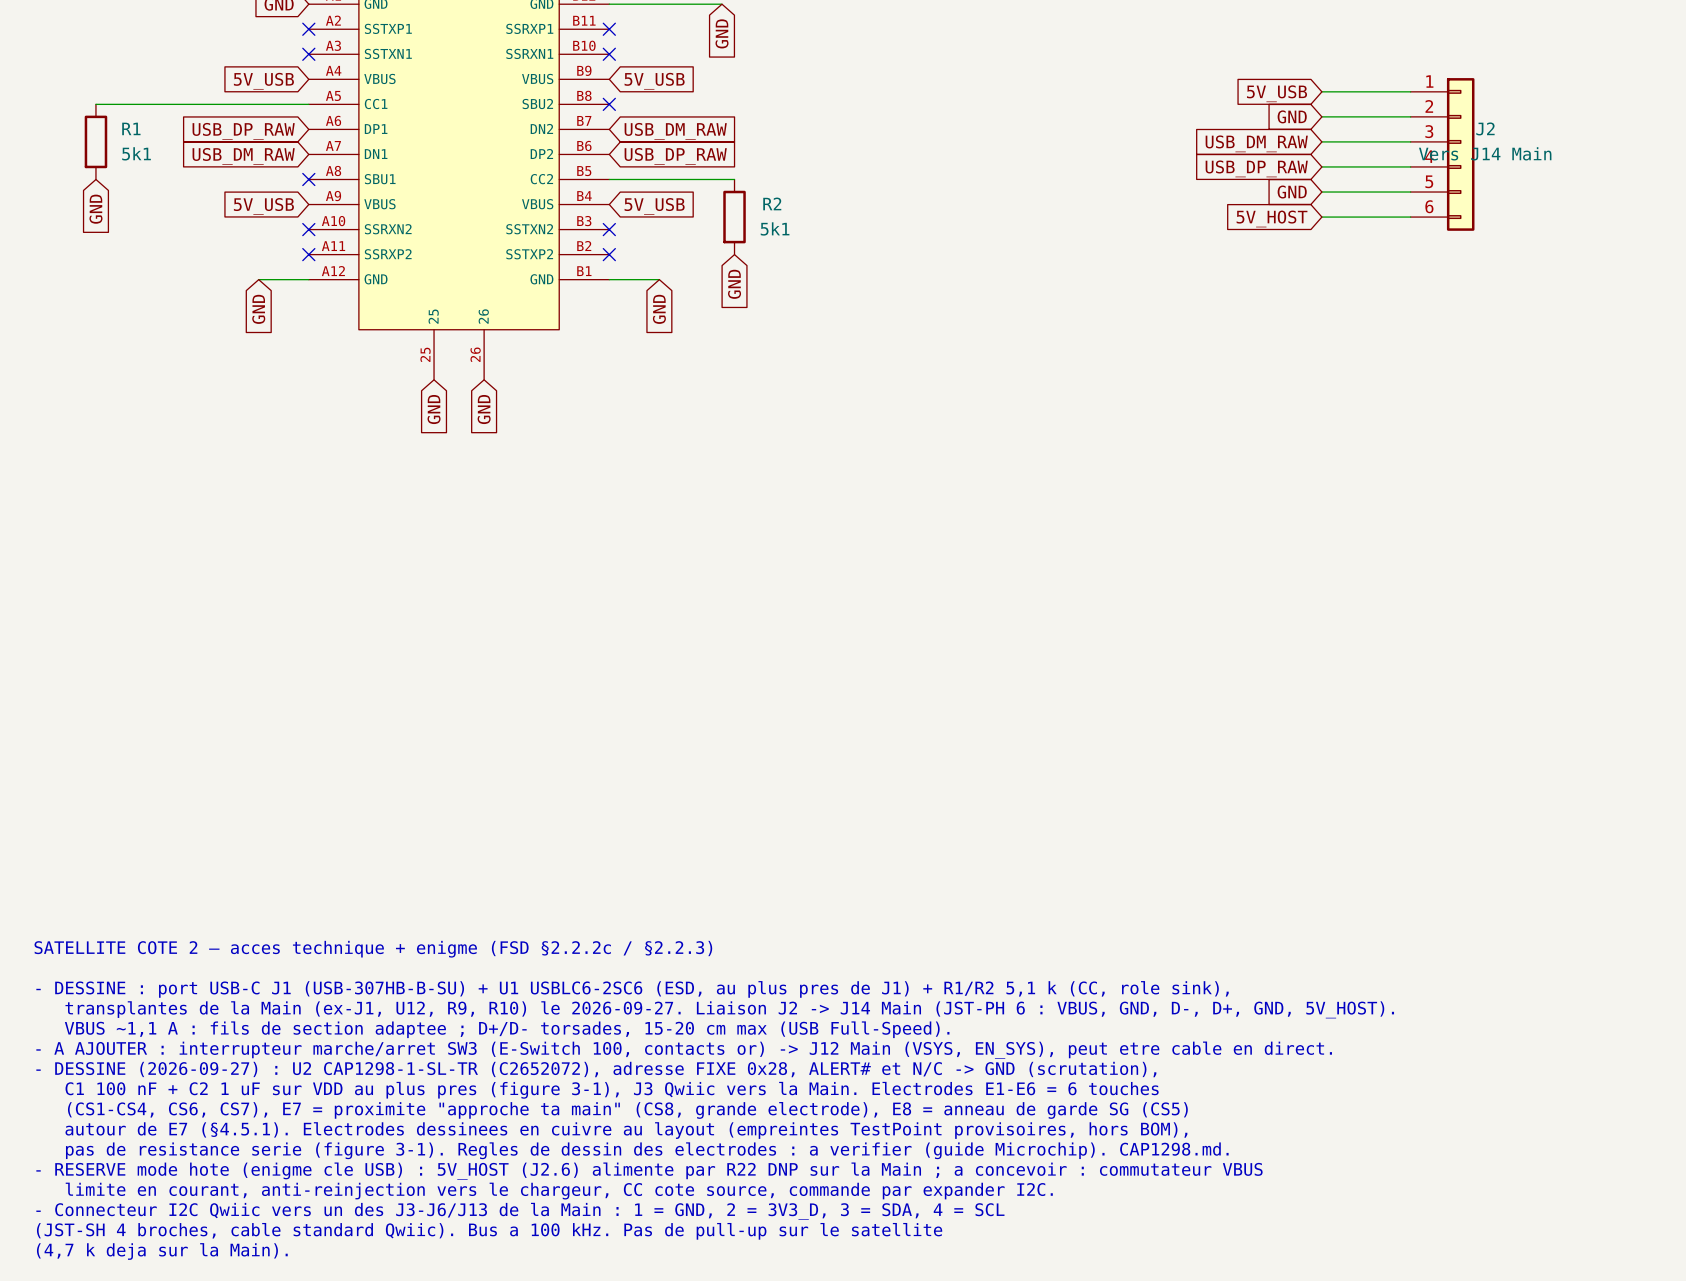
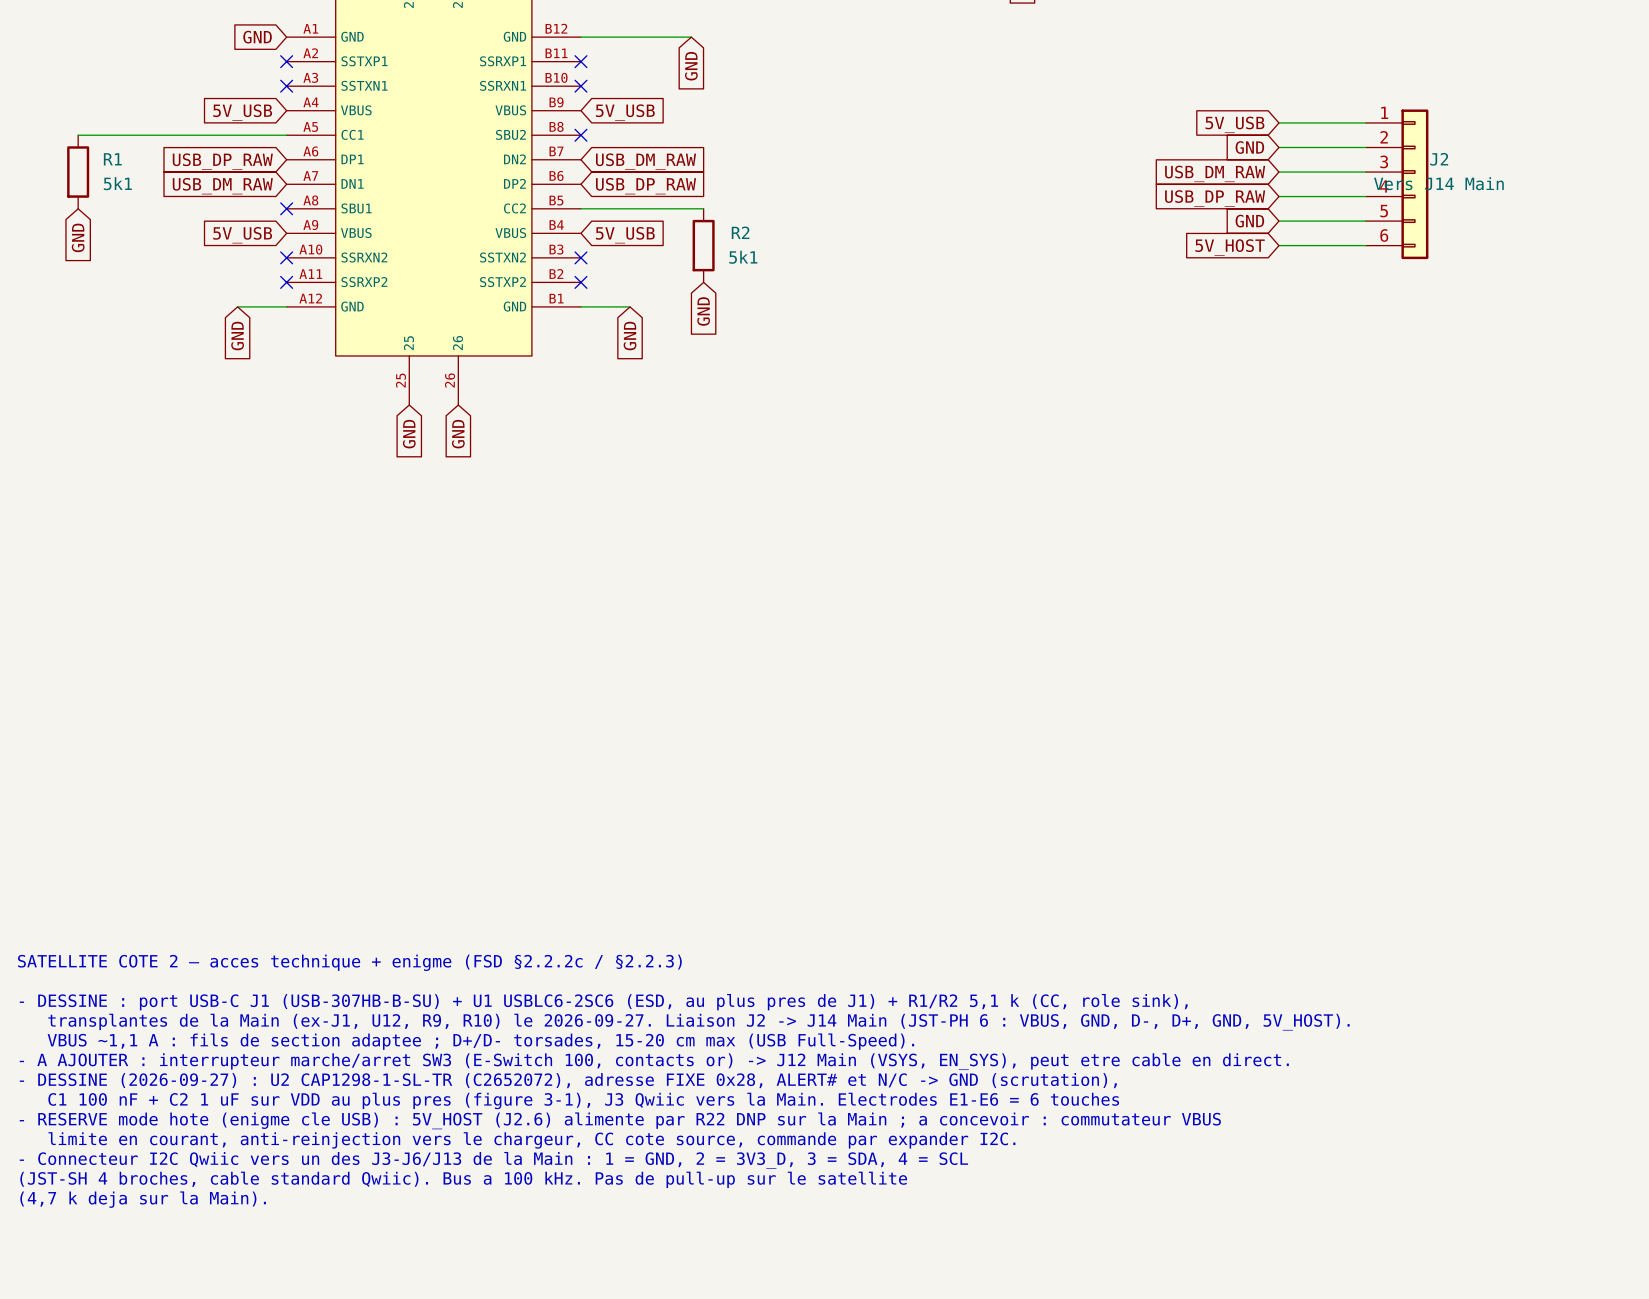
text: (CS1-CS4, CS6, CS7), E7 = proximite "approche ta main" (CS8, grande electrode), E8 = anneau de garde SG (CS5) (627, 1110) -> - RESERVE mode hote (enigme cle USB) : 5V_HOST (J2.6) alimente par R22 DNP sur la Main ; a concevoir : commutateur VBUS (620, 1120)
text: autour de E7 (§4.5.1). Electrodes dessinees en cuivre au layout (empreintes TestPoint provisoires, hors BOM), (626, 1130) -> limite en courant, anti-reinjection vers le chargeur, CC cote source, commande par expander I2C. (531, 1140)
text: pas de resistance serie (figure 3-1). Regles de dessin des electrodes : a verifier (guide Microchip). CAP1298.md. (647, 1150) -> - Connecteur I2C Qwiic vers un des J3-J6/J13 de la Main : 1 = GND, 2 = 3V3_D, 3 = SDA, 4 = SCL (493, 1160)
text: - RESERVE mode hote (enigme cle USB) : 5V_HOST (J2.6) alimente par R22 DNP sur la Main ; a concevoir : commutateur VBUS (649, 1171) -> (JST-SH 4 broches, cable standard Qwiic). Bus a 100 kHz. Pas de pull-up sur le satellite (463, 1179)
text: limite en courant, anti-reinjection vers le chargeur, CC cote source, commande par expander I2C. (559, 1191) -> (4,7 k deja sur la Main). (143, 1199)
text: - Connecteur I2C Qwiic vers un des J3-J6/J13 de la Main : 1 = GND, 2 = 3V3_D, 3 = SDA, 4 = SCL (520, 1211) -> none
text: (JST-SH 4 broches, cable standard Qwiic). Bus a 100 kHz. Pas de pull-up sur le satellite (489, 1231) -> none
text: (4,7 k deja sur la Main). (162, 1251) -> none

